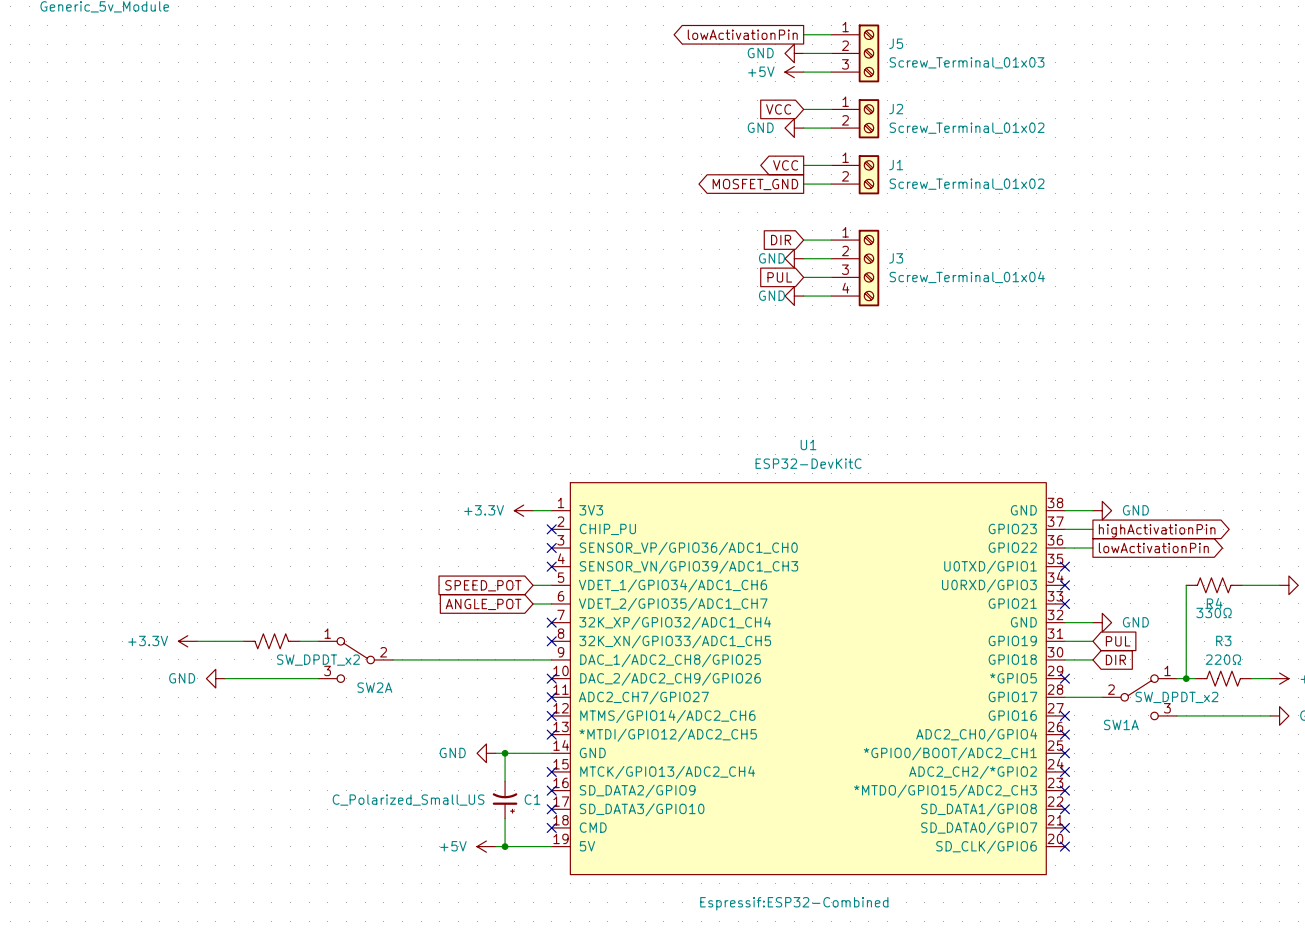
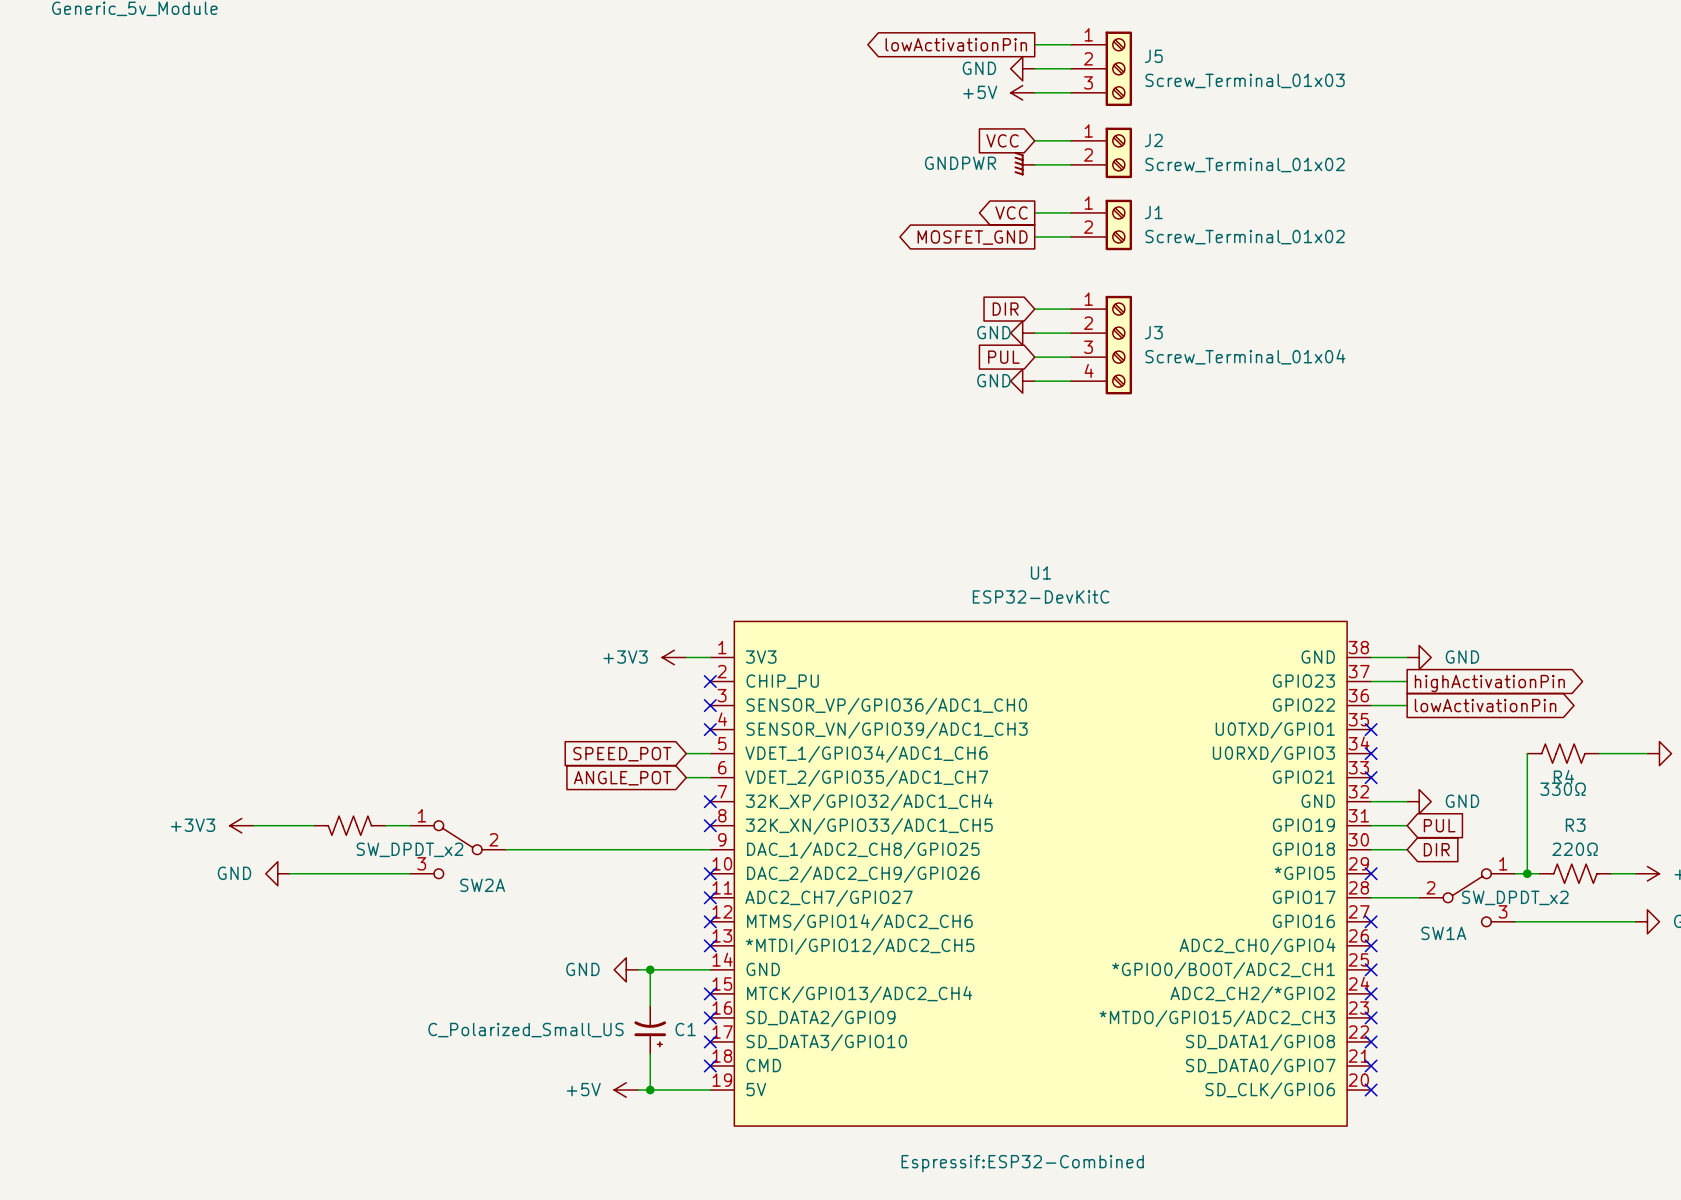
power symbol: GND (794, 128) -> GNDPWR (1024, 163)
power symbol: +3.3V (523, 510) -> +3V3 (674, 657)
power symbol: +3.3V (187, 641) -> +3V3 (241, 825)

